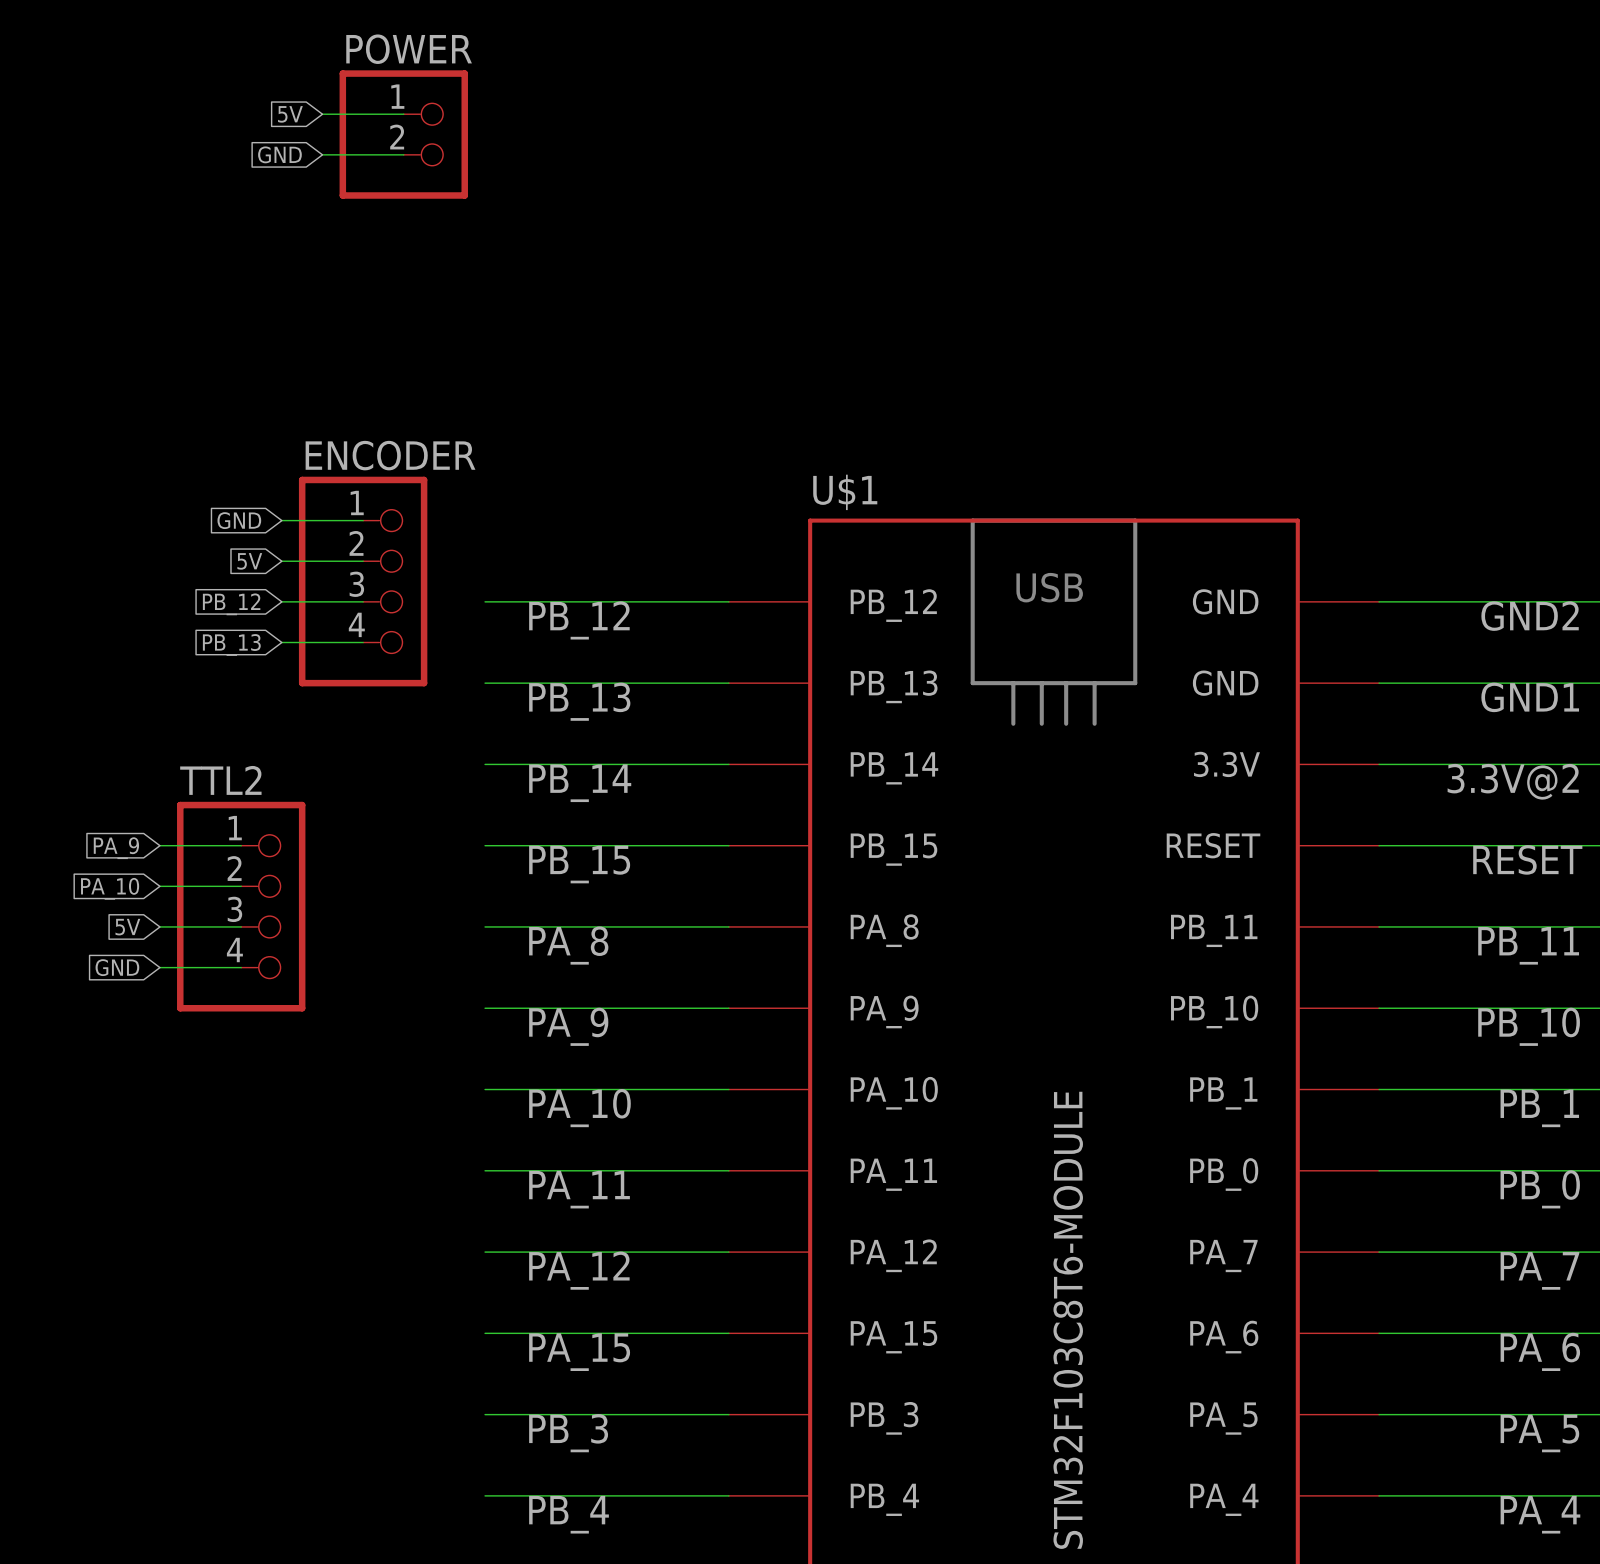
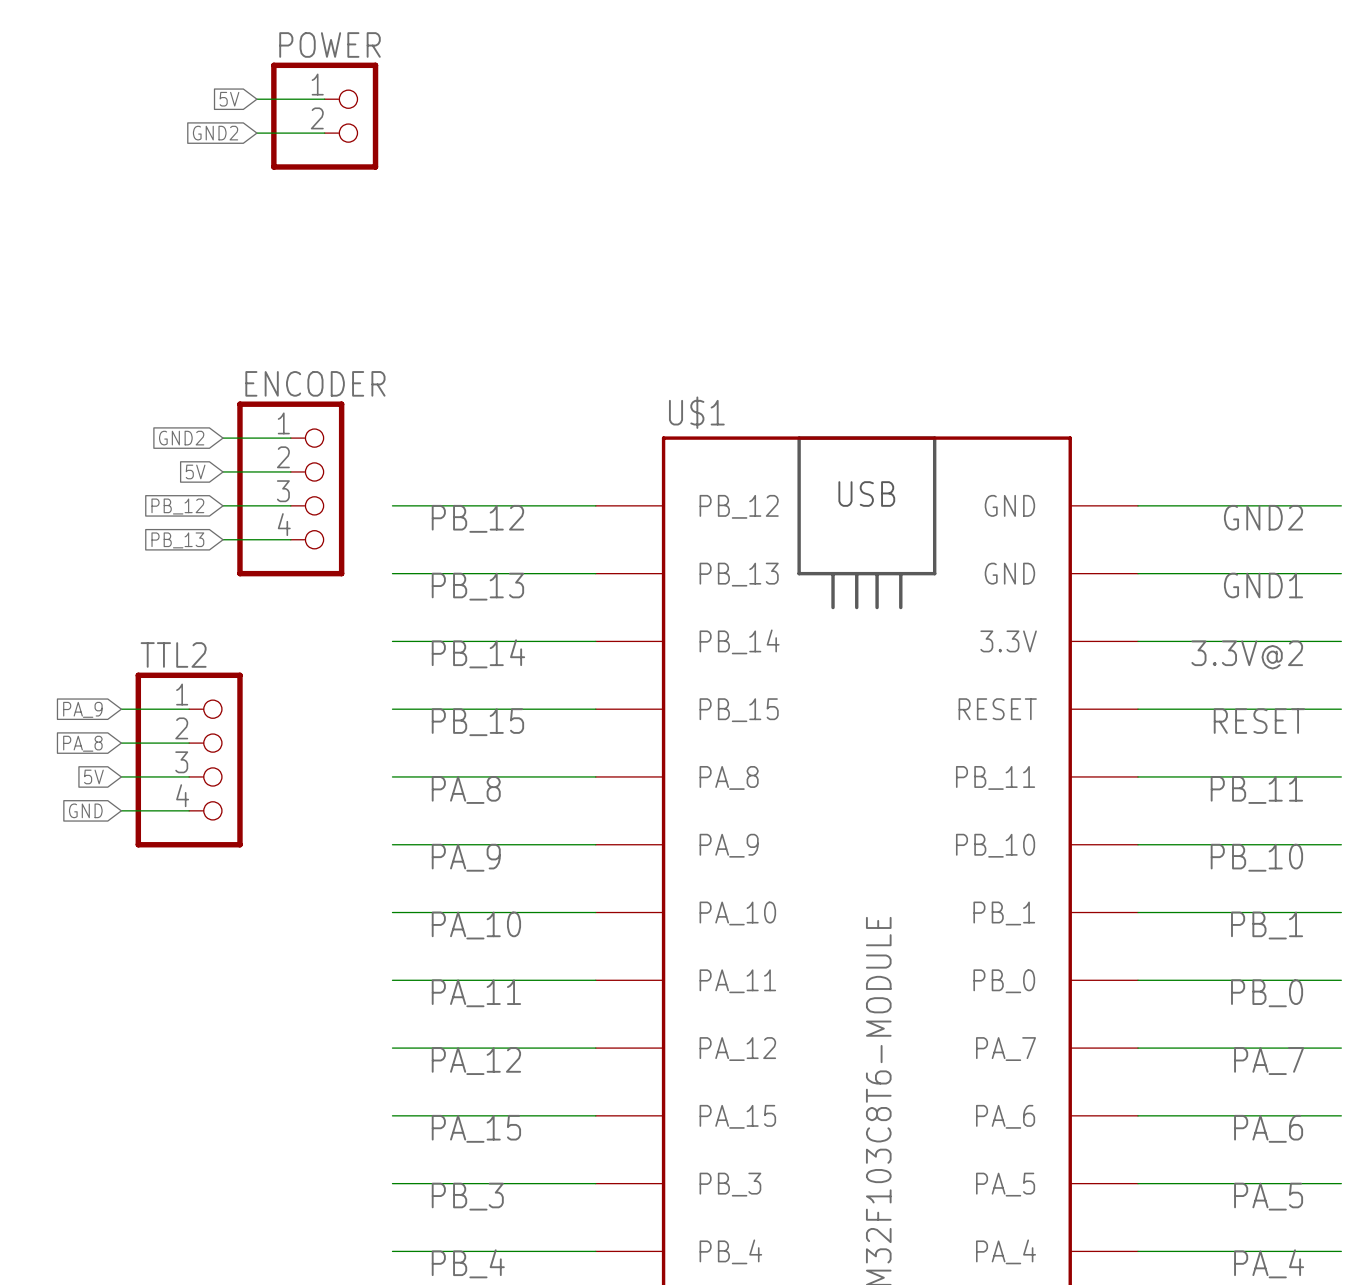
global label: GND (279, 154) -> GND2 (215, 133)
global label: GND (239, 520) -> GND2 (181, 438)
global label: PA_10 (110, 888) -> PA_8 (82, 743)

